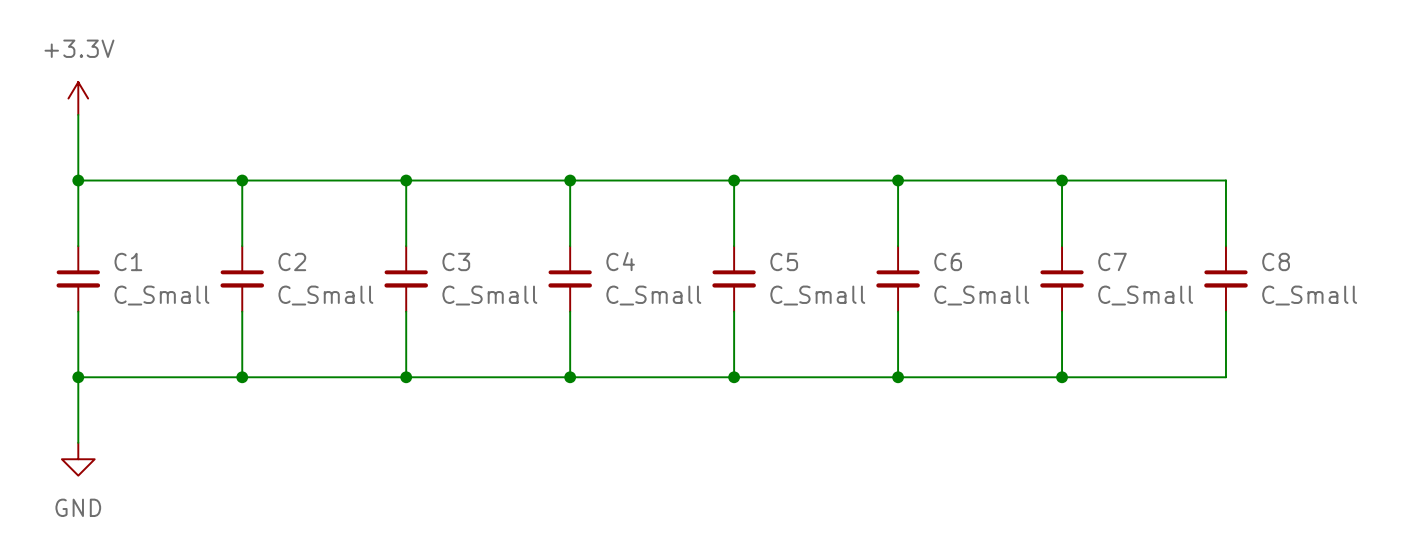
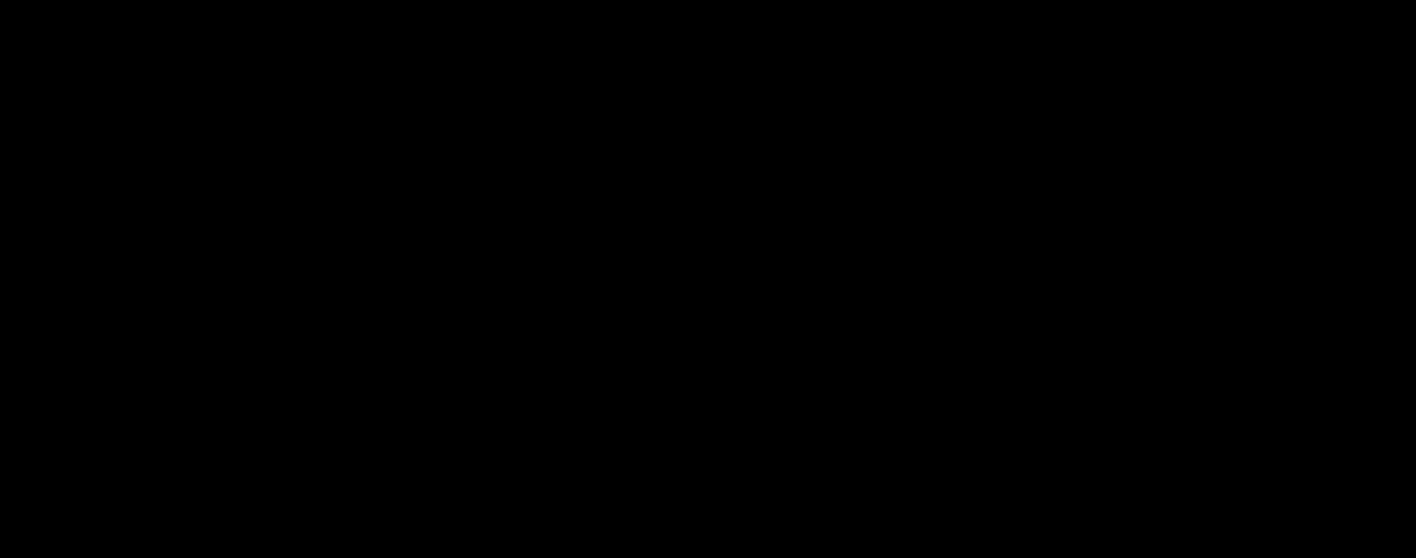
power symbol: +3.3V (78, 98) -> none
wire: (78, 114) (78, 246) -> none
wire: (78, 180) (1225, 180) (1225, 246) -> none
junction: (78, 180) -> none
wire: (242, 180) (242, 246) -> none
junction: (242, 180) -> none
wire: (406, 180) (406, 246) -> none
junction: (406, 180) -> none
wire: (570, 180) (570, 246) -> none
junction: (570, 180) -> none
wire: (734, 180) (734, 246) -> none
junction: (734, 180) -> none
wire: (898, 180) (898, 246) -> none
junction: (898, 180) -> none
wire: (1062, 180) (1062, 246) -> none
junction: (1062, 180) -> none
C1: C_Small (78, 278) -> none
C2: C_Small (242, 278) -> none
C3: C_Small (406, 278) -> none
C4: C_Small (570, 278) -> none
C5: C_Small (734, 278) -> none
C6: C_Small (898, 278) -> none
C7: C_Small (1062, 278) -> none
C8: C_Small (1225, 278) -> none
wire: (78, 311) (78, 442) -> none
wire: (242, 311) (242, 377) -> none
wire: (406, 311) (406, 377) -> none
wire: (570, 311) (570, 377) -> none
wire: (734, 311) (734, 377) -> none
wire: (898, 311) (898, 377) -> none
wire: (1062, 311) (1062, 377) -> none
wire: (1225, 311) (1225, 377) (78, 377) -> none
junction: (78, 377) -> none
junction: (242, 377) -> none
junction: (406, 377) -> none
junction: (570, 377) -> none
junction: (734, 377) -> none
junction: (898, 377) -> none
junction: (1062, 377) -> none
power symbol: GND (78, 459) -> none

